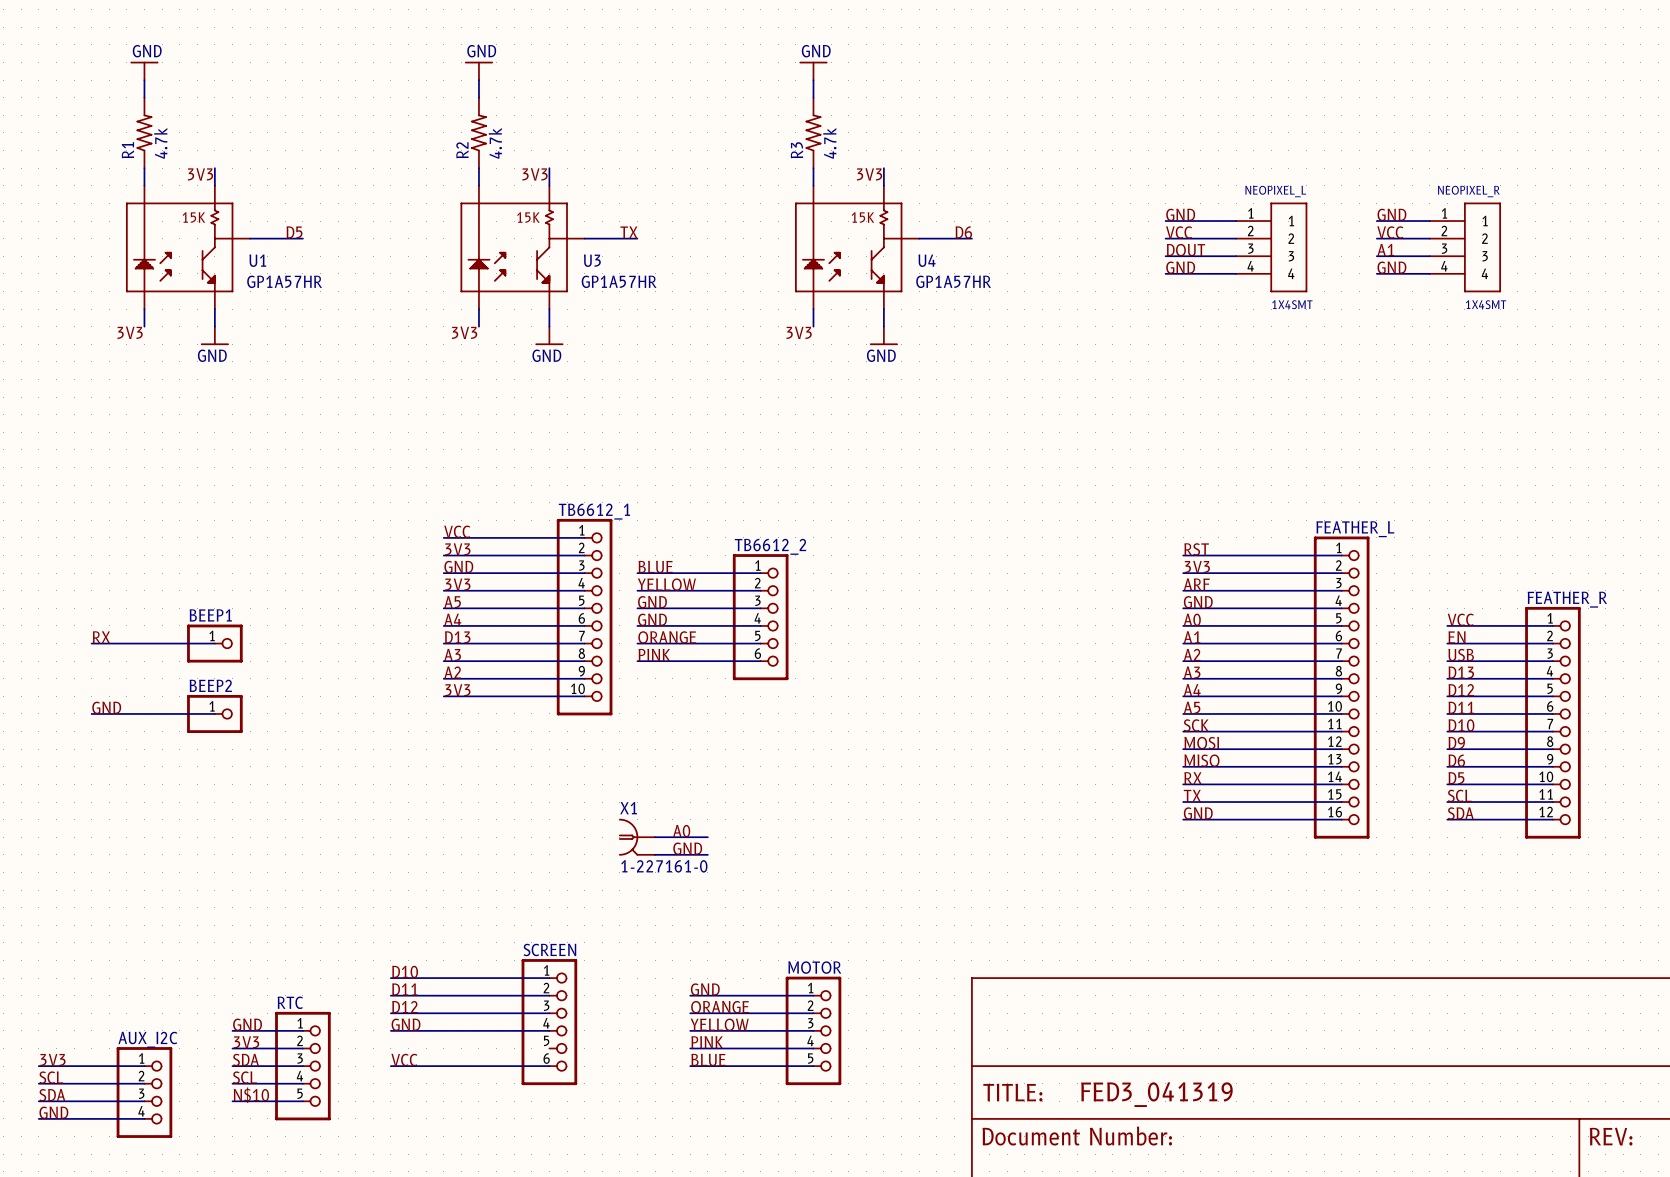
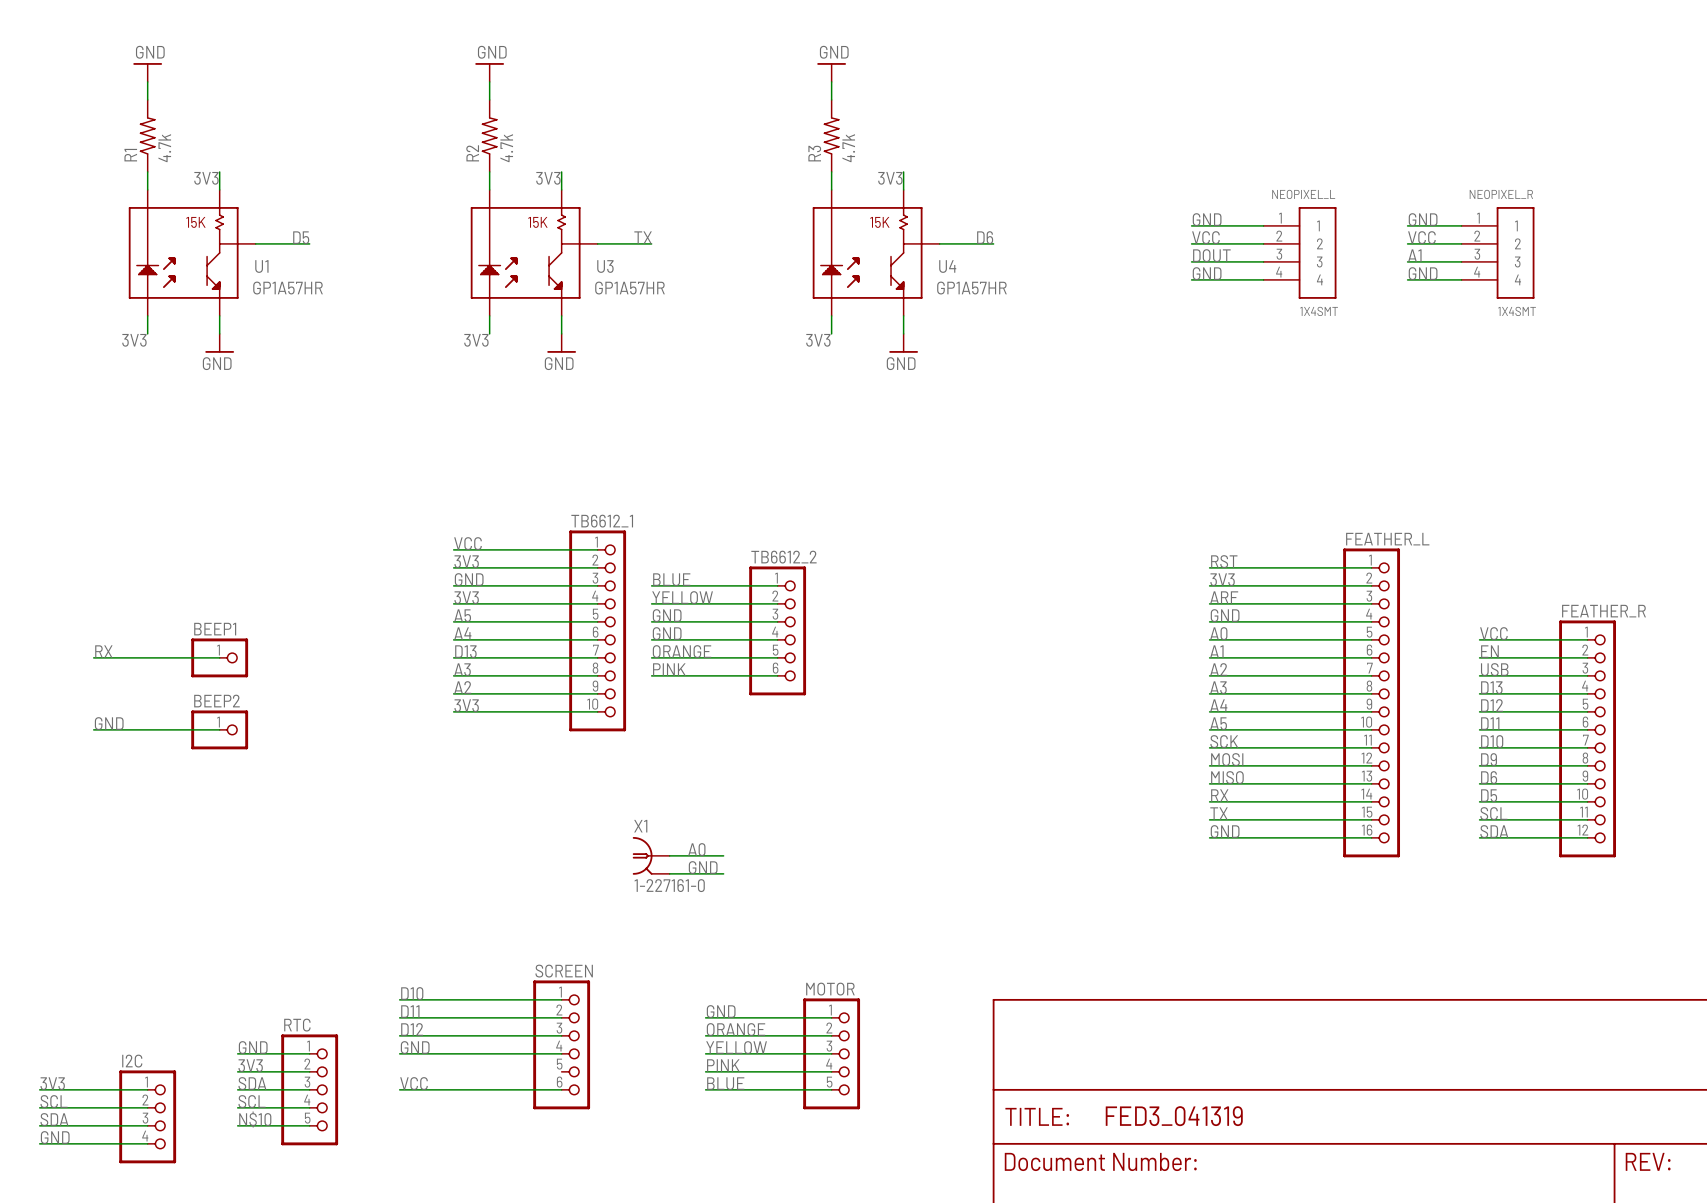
AUX_I2C name: AUX_I2C (147, 1039) -> I2C (132, 1061)

